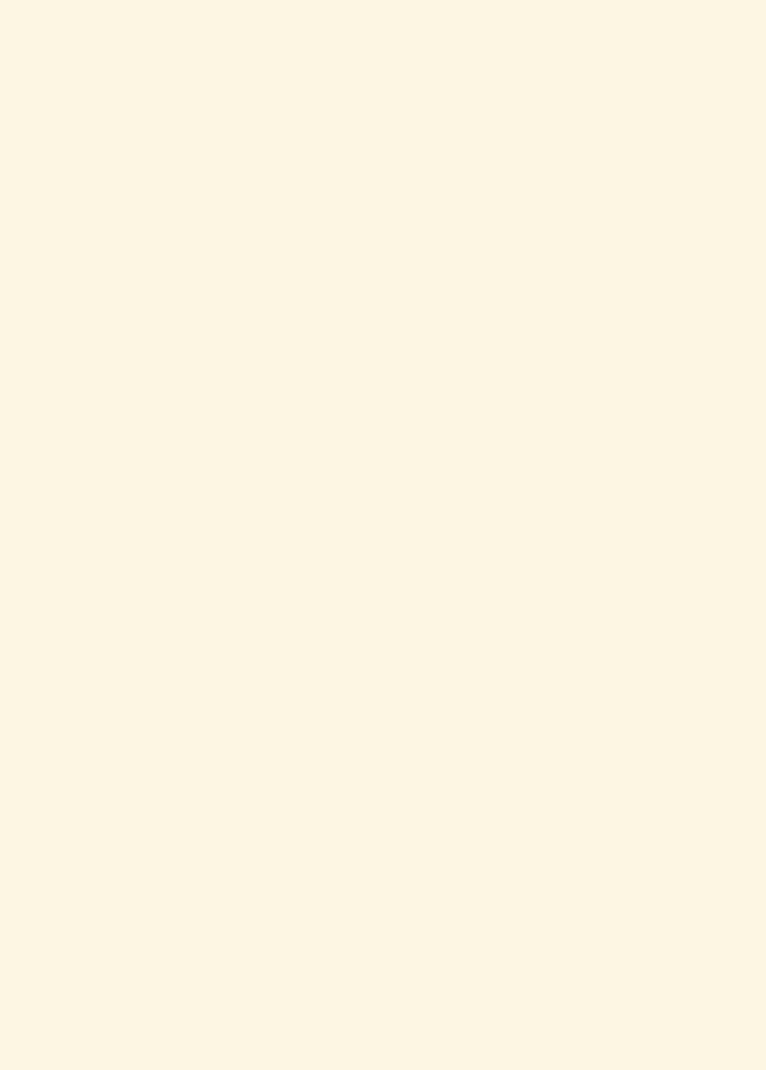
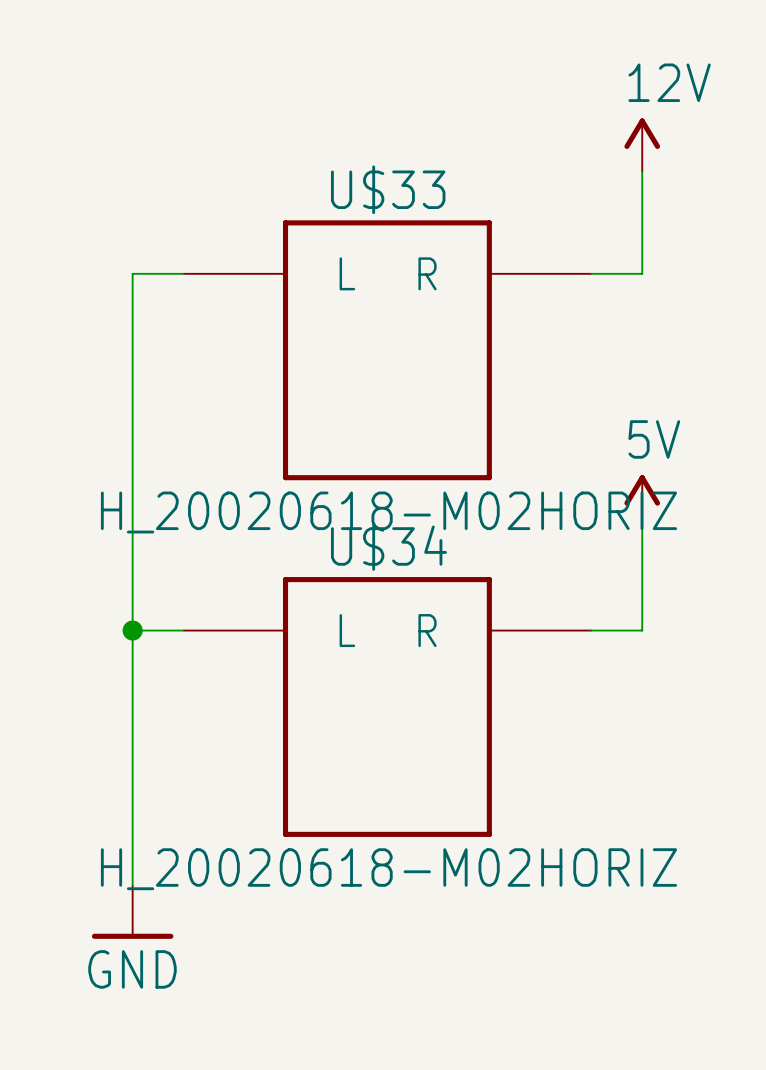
power symbol: none -> 12V (642, 145)
wire: none -> (642, 171) (642, 273) (591, 273)
wire: none -> (183, 273) (132, 273) (132, 885)
U$33: none -> H_20020618-M02HORIZ (387, 350)
power symbol: none -> 5V (642, 501)
wire: none -> (642, 528) (642, 630) (591, 630)
wire: none -> (132, 630) (183, 630)
junction: none -> (132, 630)
U$34: none -> H_20020618-M02HORIZ (387, 706)
power symbol: none -> GND (132, 912)

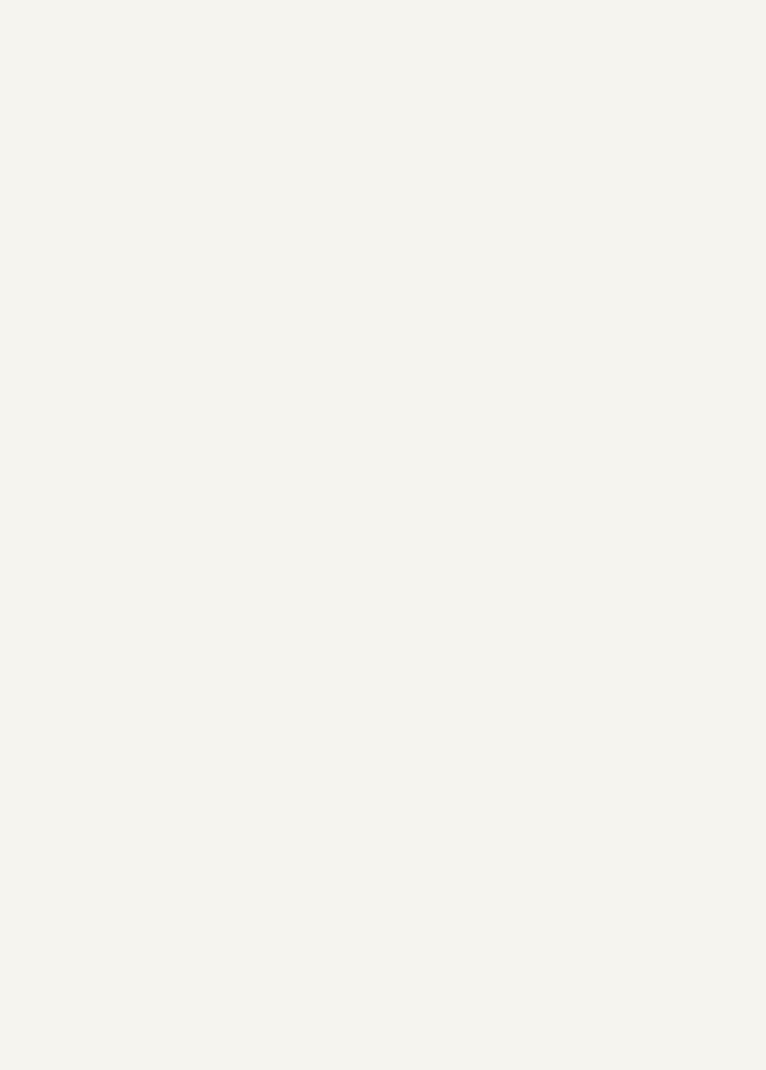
power symbol: 12V (642, 145) -> none
wire: (642, 171) (642, 273) (591, 273) -> none
wire: (183, 273) (132, 273) (132, 885) -> none
U$33: H_20020618-M02HORIZ (387, 350) -> none
power symbol: 5V (642, 501) -> none
wire: (642, 528) (642, 630) (591, 630) -> none
wire: (132, 630) (183, 630) -> none
junction: (132, 630) -> none
U$34: H_20020618-M02HORIZ (387, 706) -> none
power symbol: GND (132, 912) -> none

